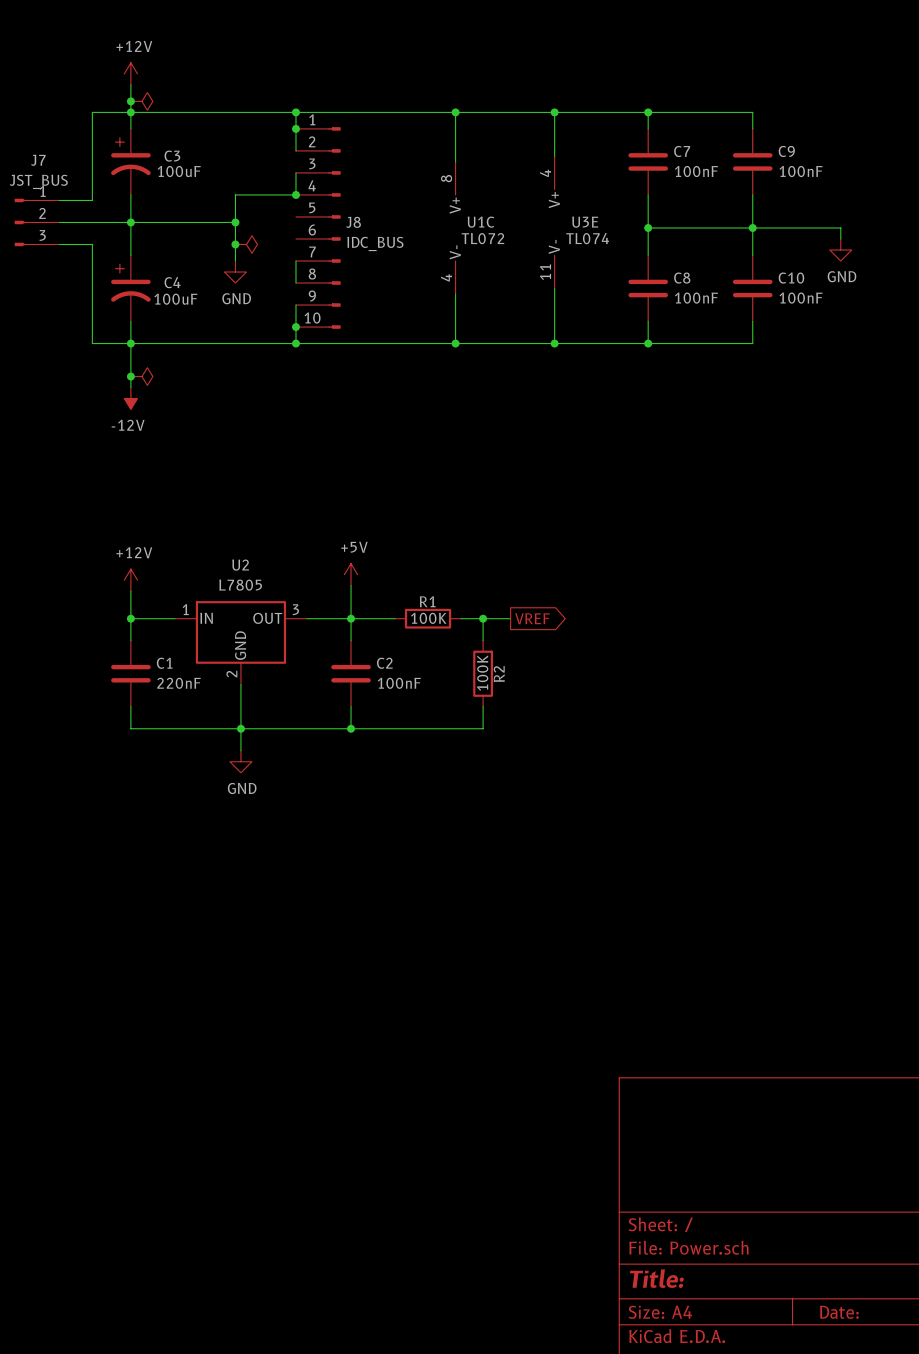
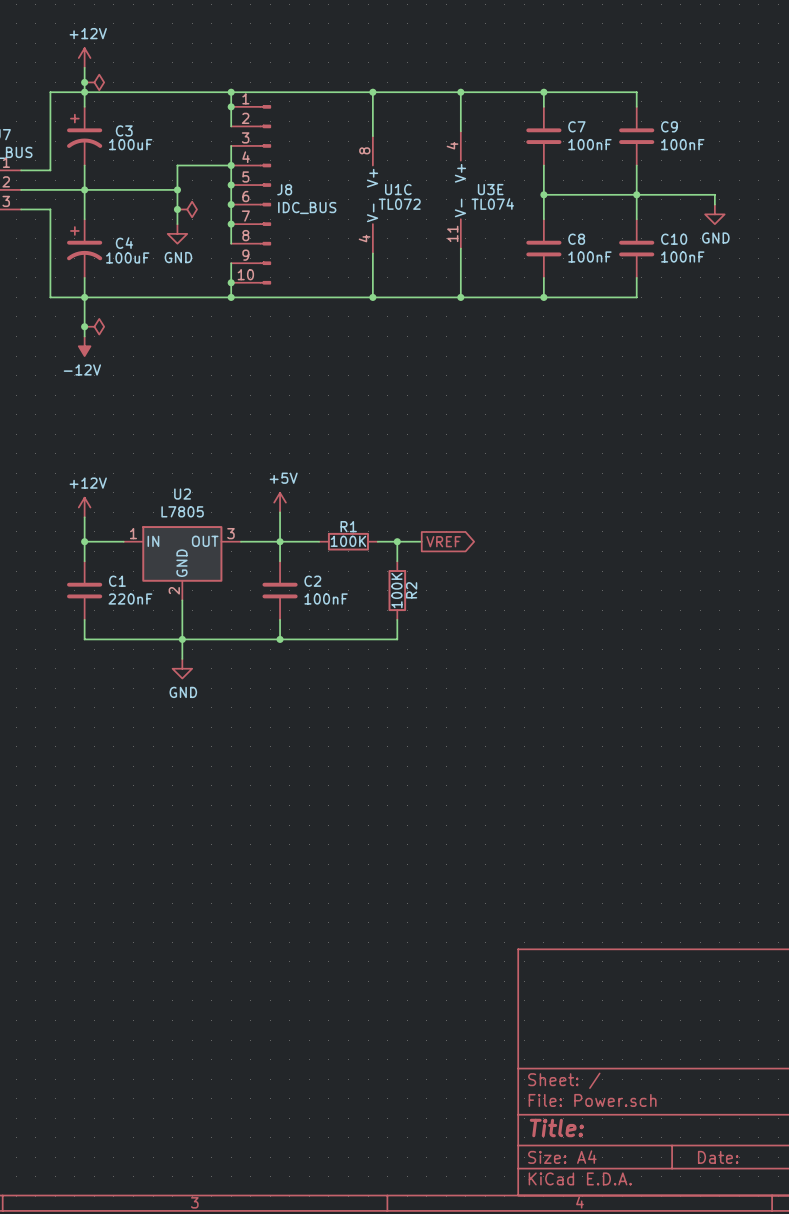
wire: none -> (231, 165) (231, 224)
junction: none -> (231, 185)
junction: none -> (231, 204)
junction: none -> (231, 224)

